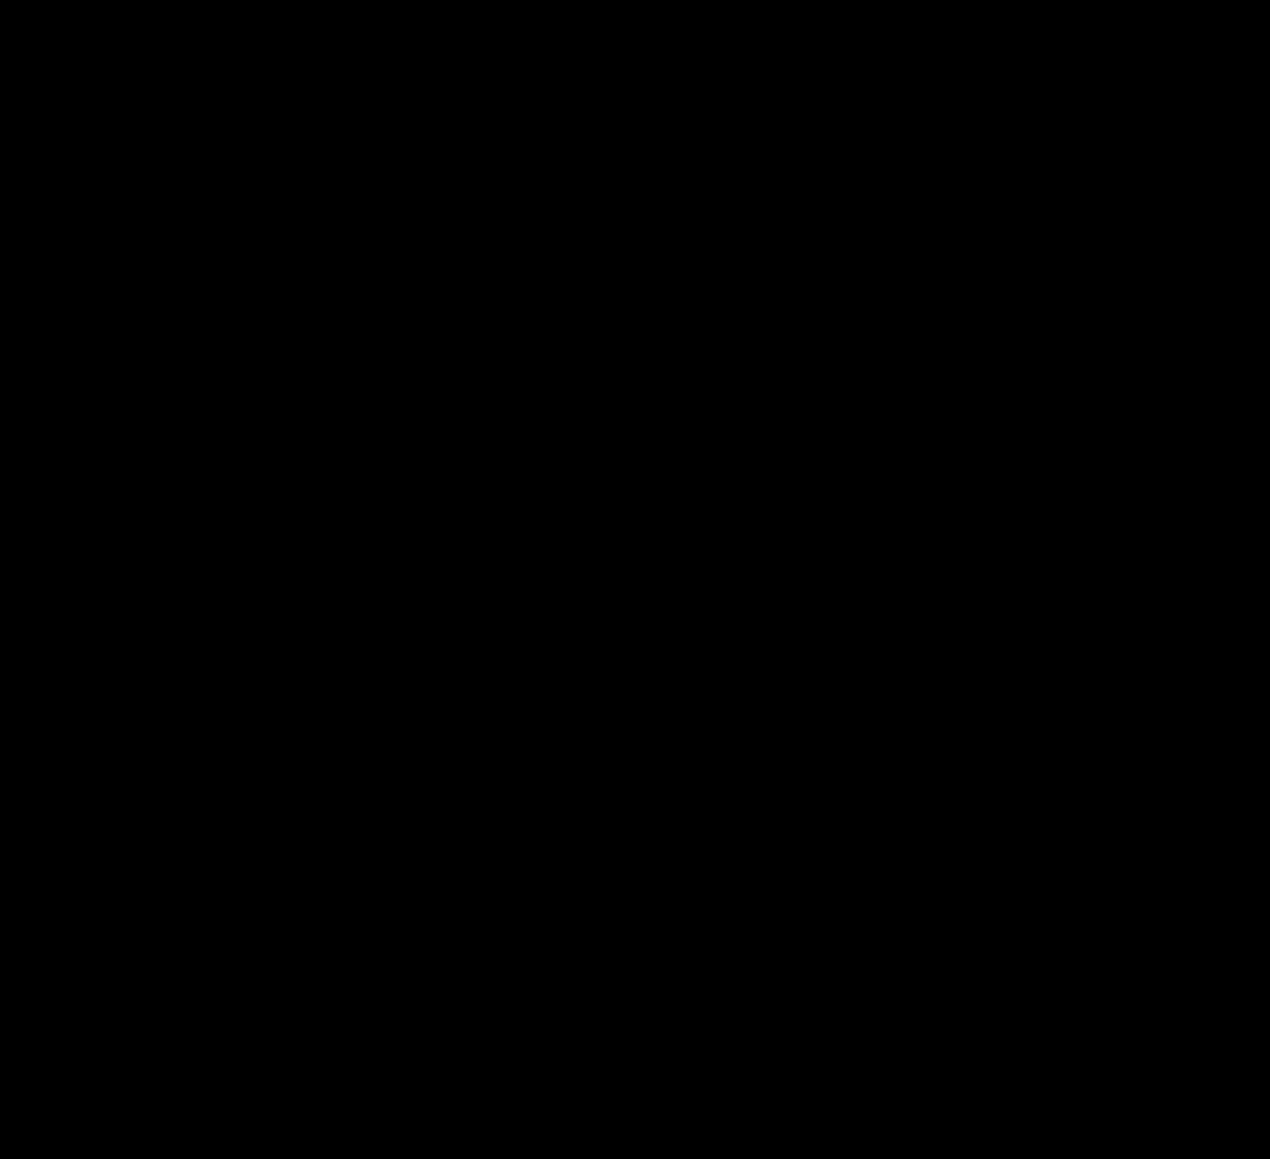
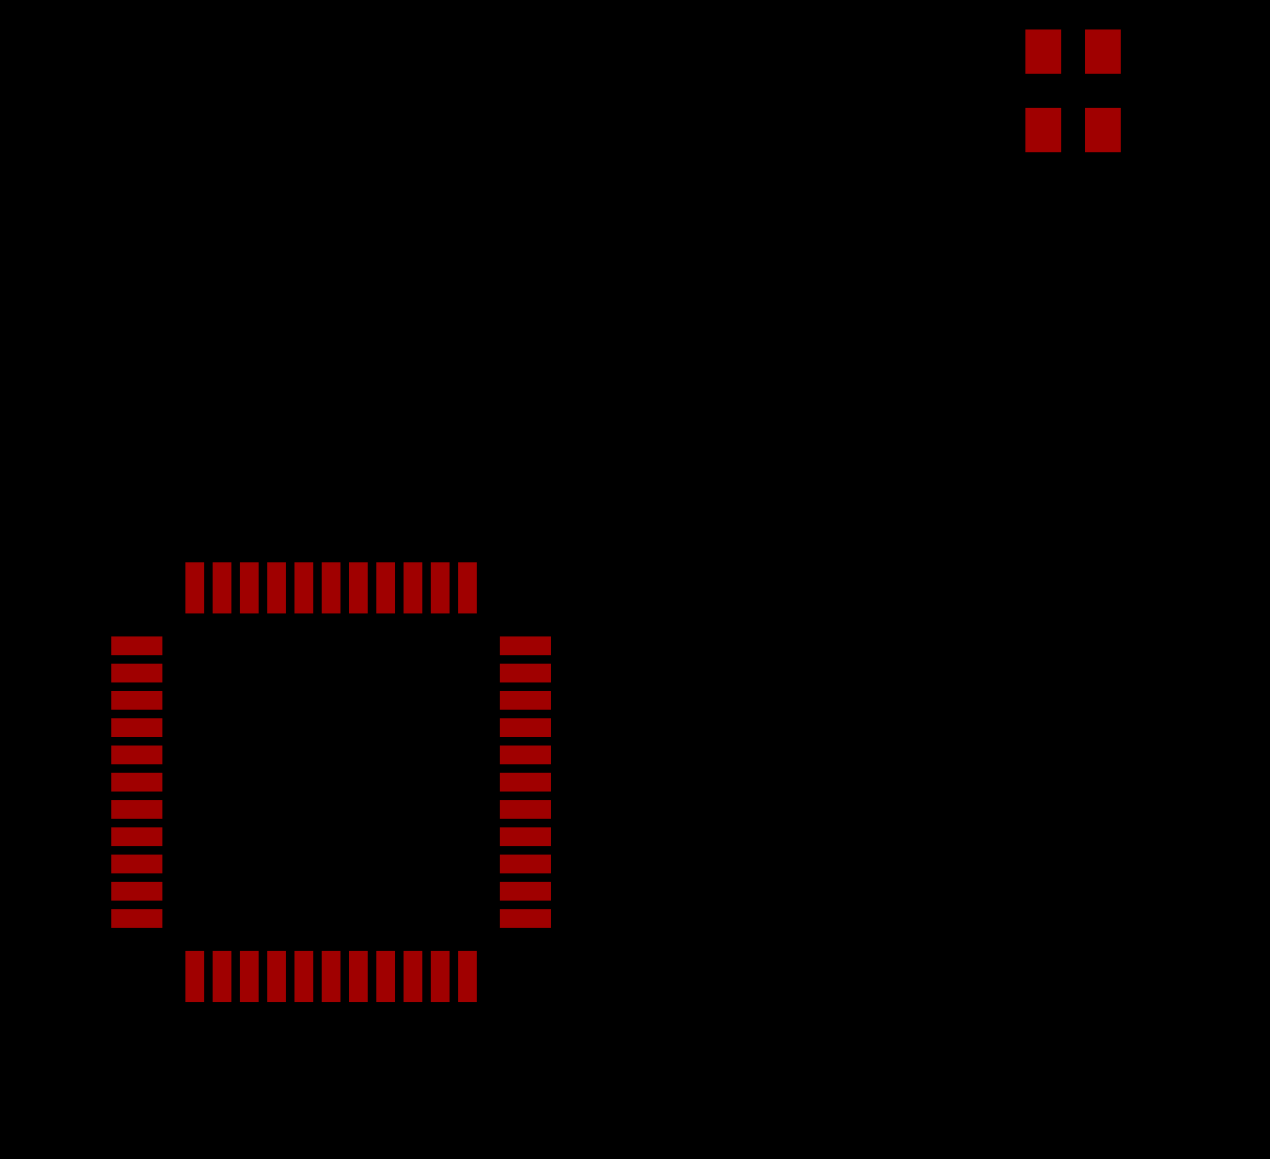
part: none -> (1073, 90)
part: none -> (331, 782)

